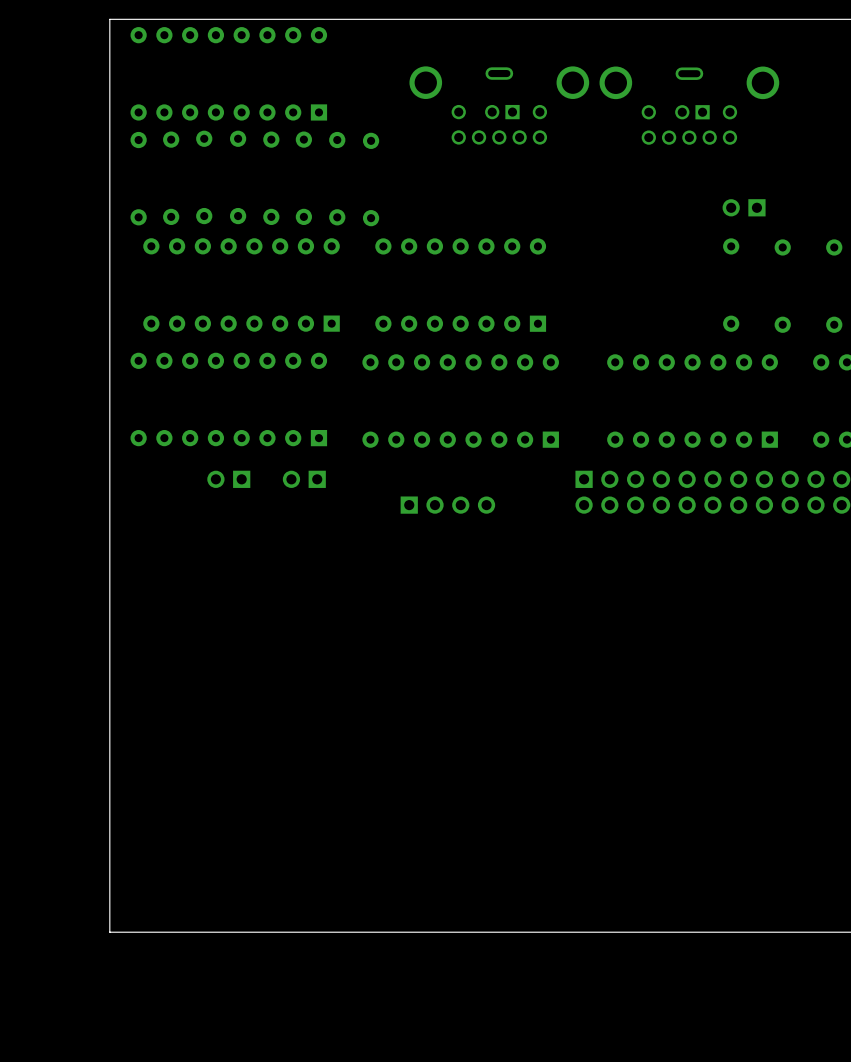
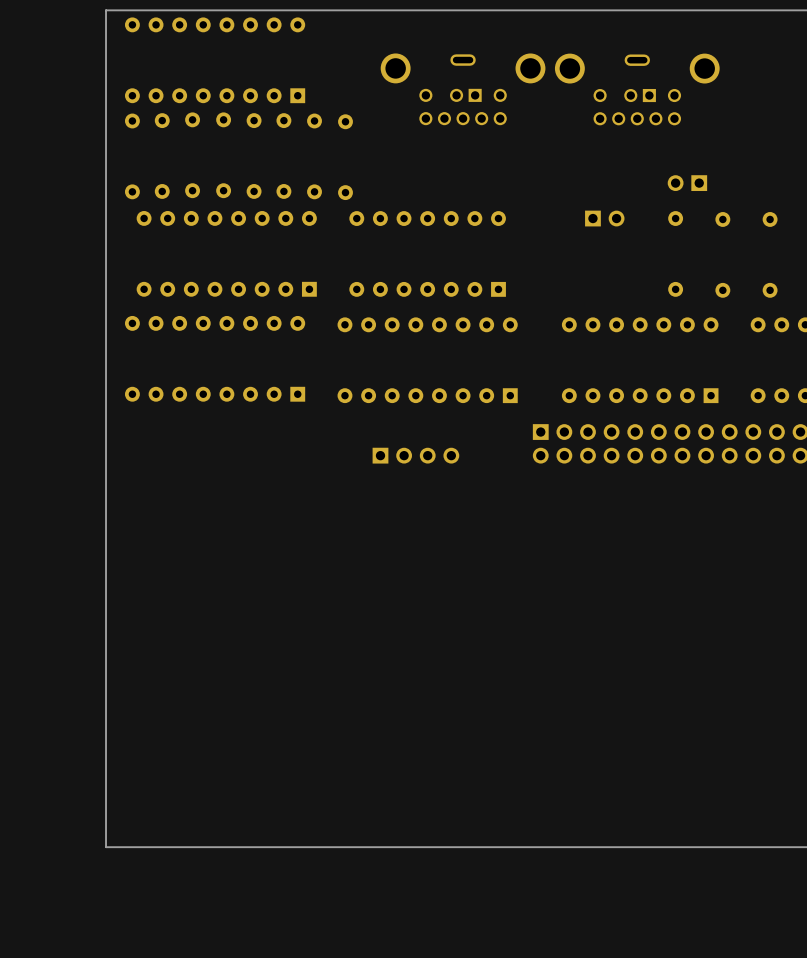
part: none -> (604, 218)
part: (228, 479) -> none
part: (304, 479) -> none

